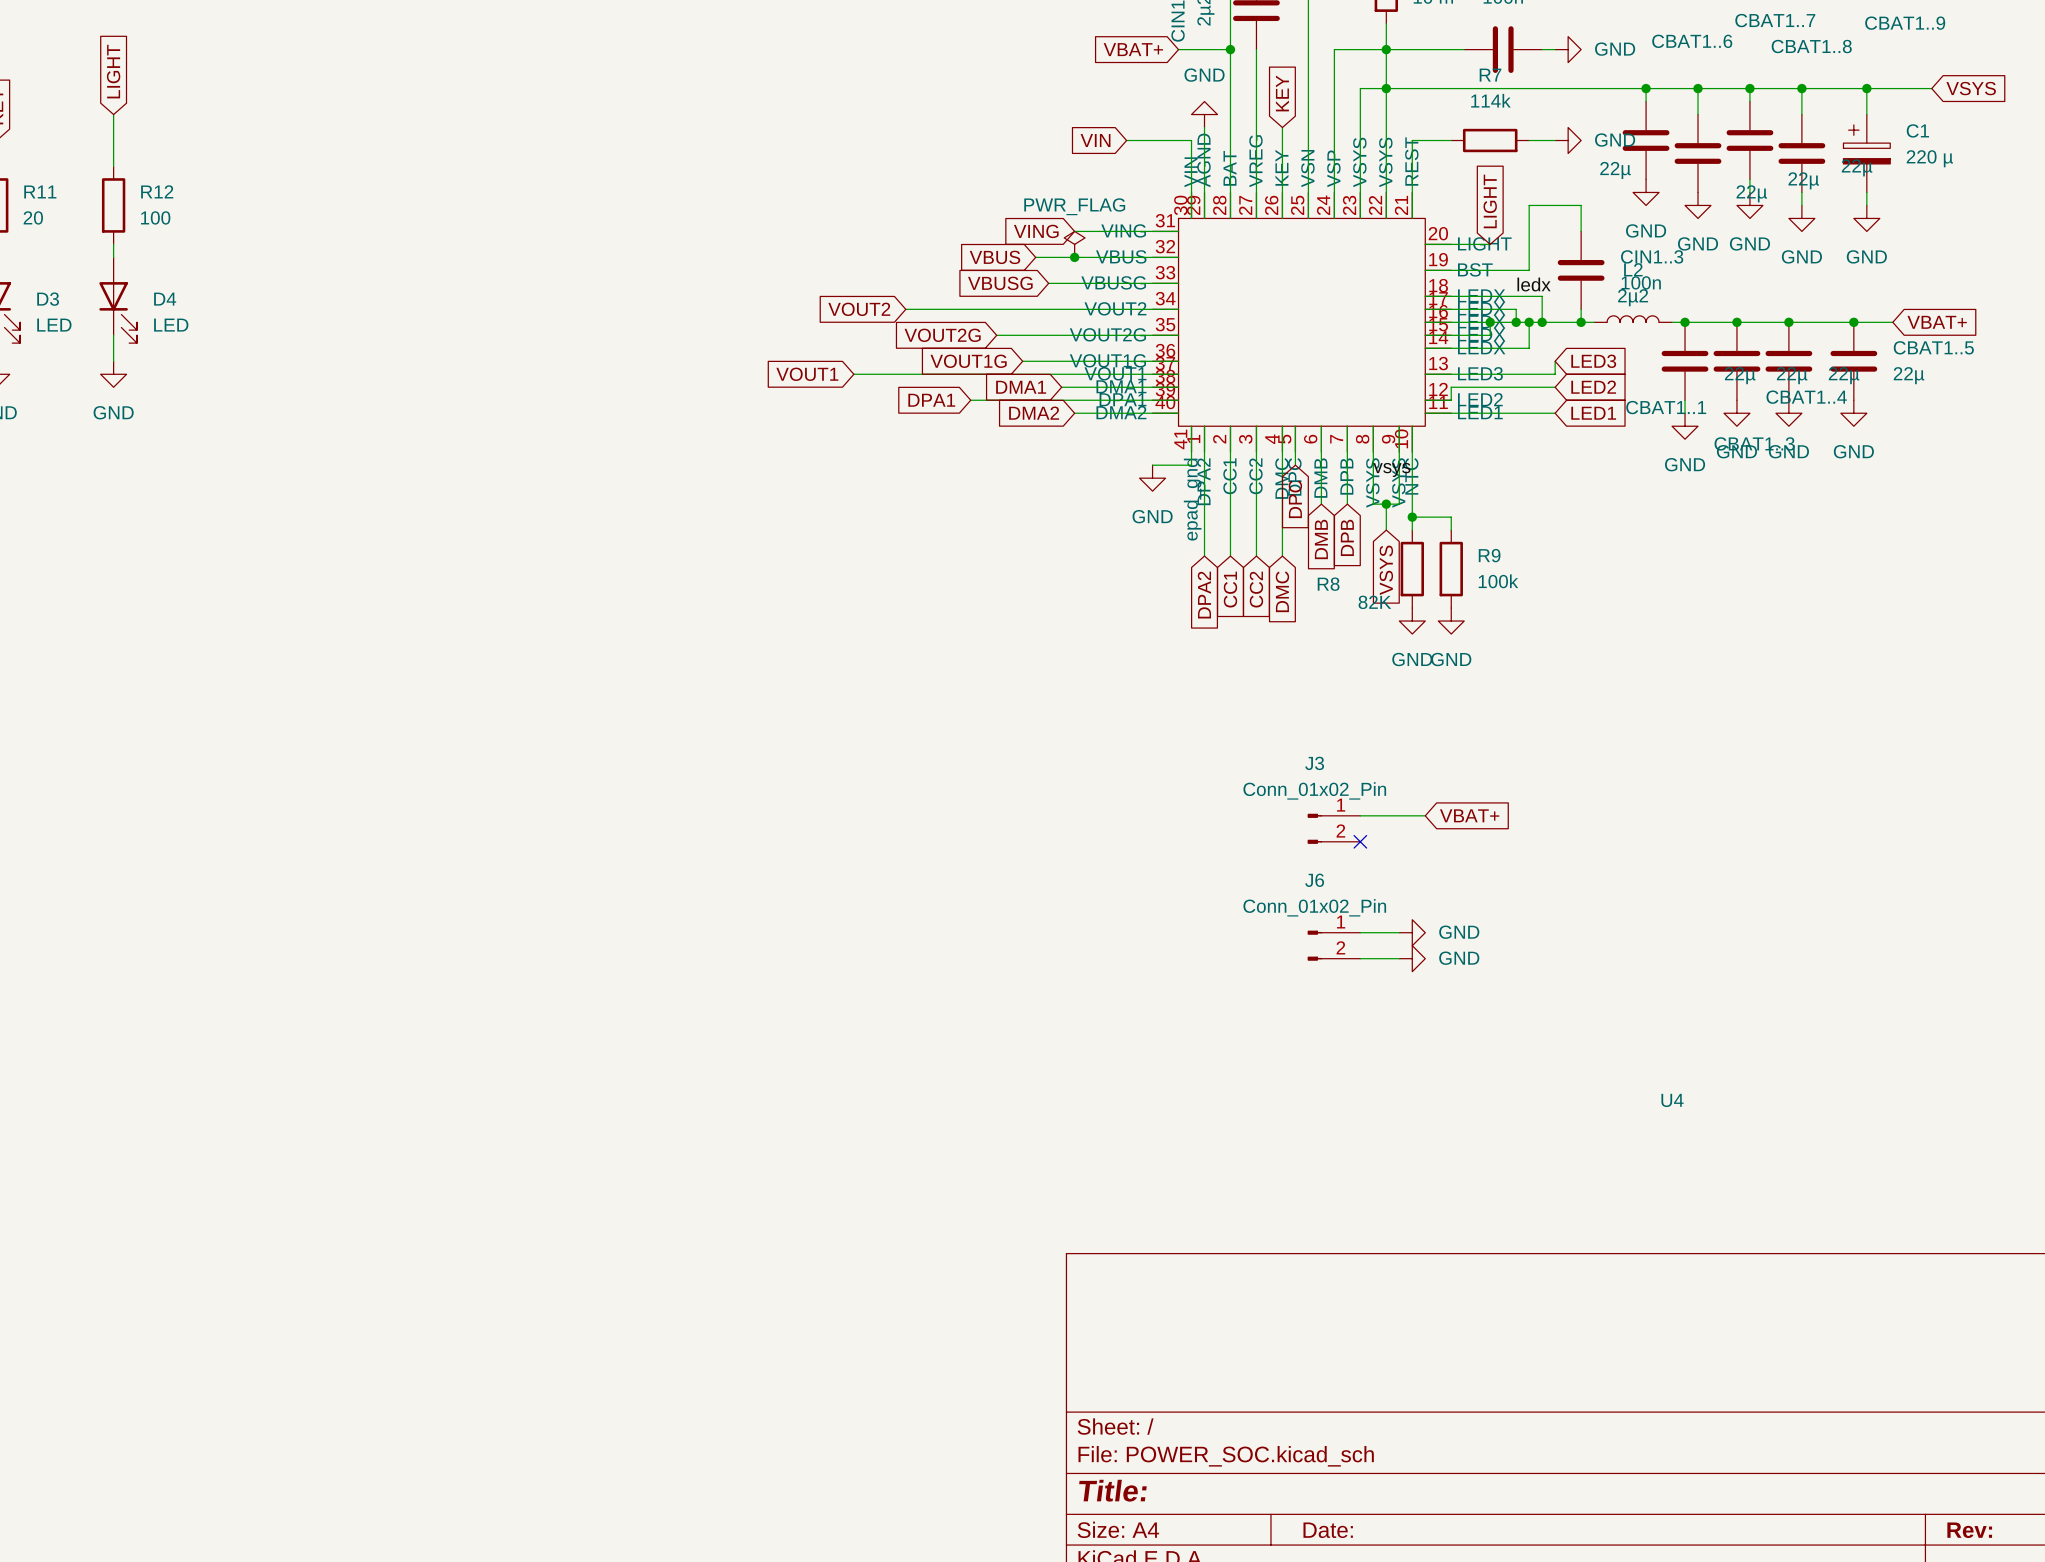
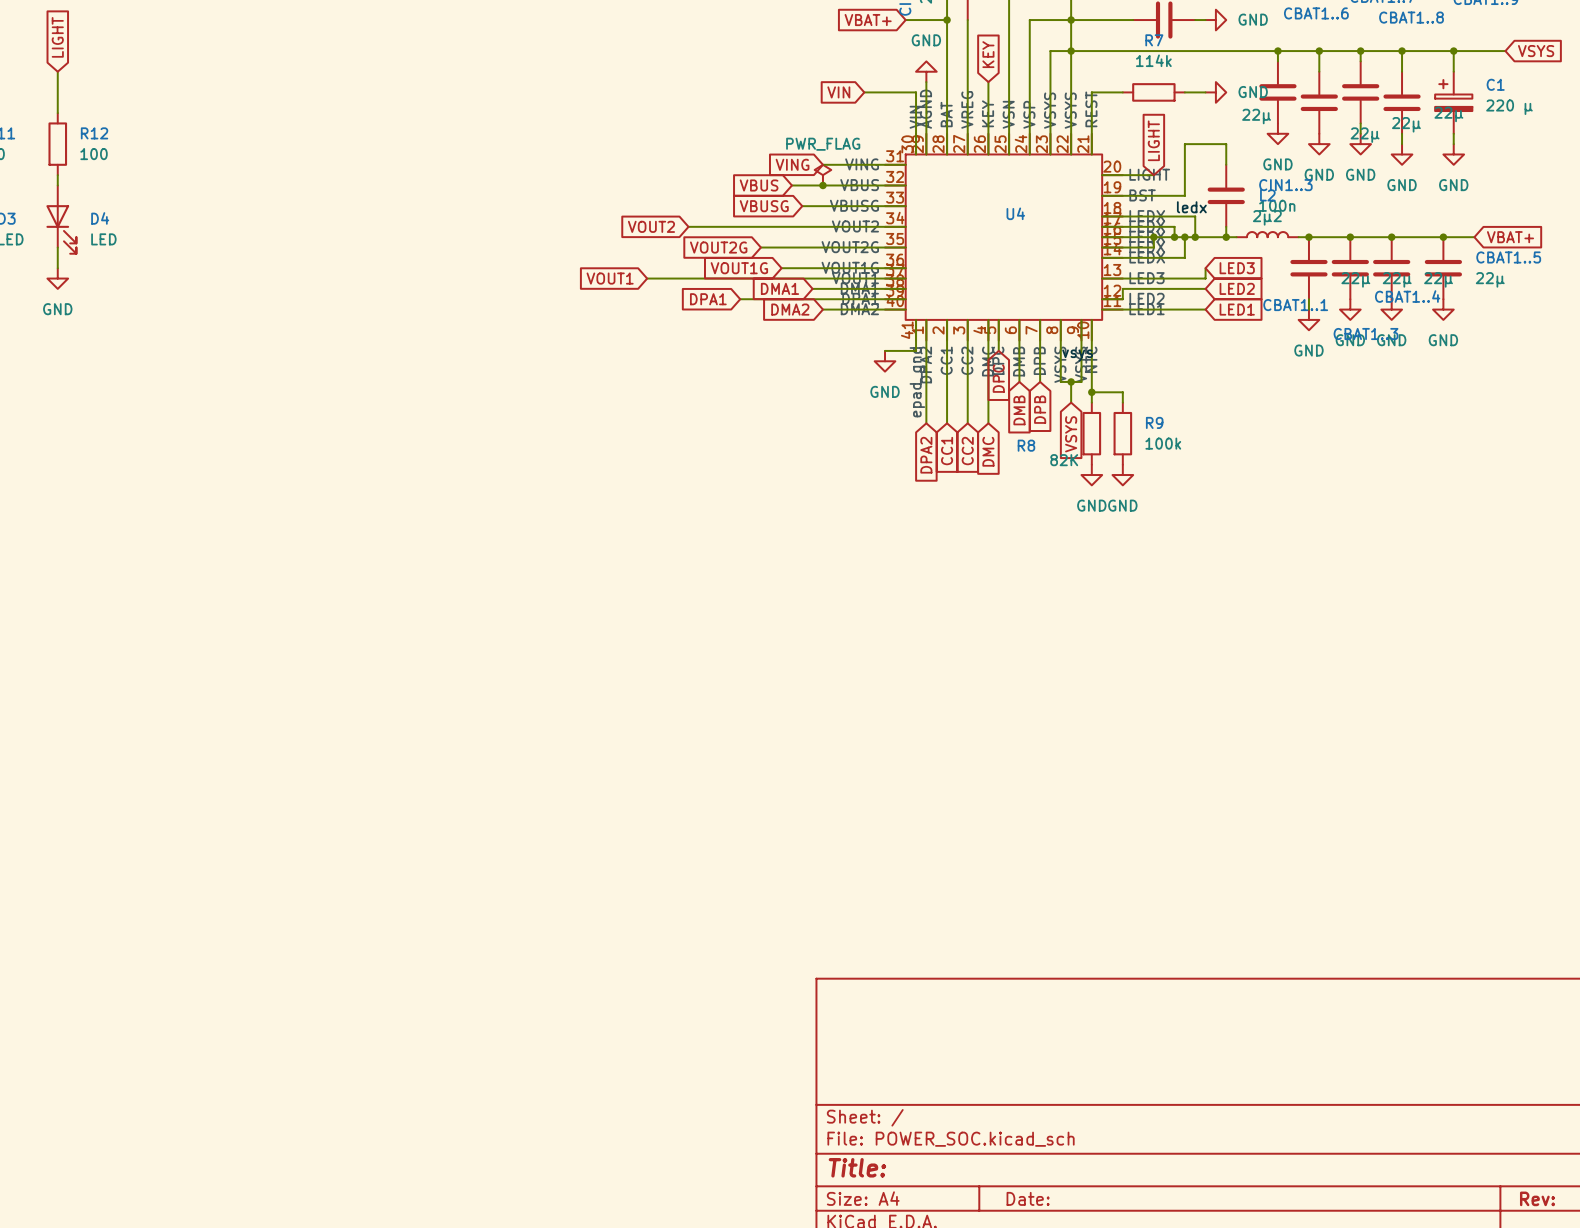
wire: (1360, 815) (1425, 815) -> none
global label: VBAT+ (1469, 815) -> none
J3: Conn_01x02_Pin (1333, 828) -> none
no-connect mark: (1360, 841) -> none
wire: (1360, 932) (1399, 932) -> none
power symbol: GND (1412, 932) -> none
J6: Conn_01x02_Pin (1333, 945) -> none
wire: (1360, 958) (1399, 958) -> none
power symbol: GND (1412, 958) -> none
U4 name position: U4 (1672, 1100) -> U4 (1015, 213)

